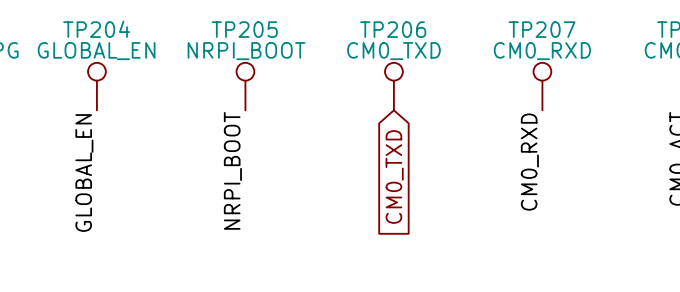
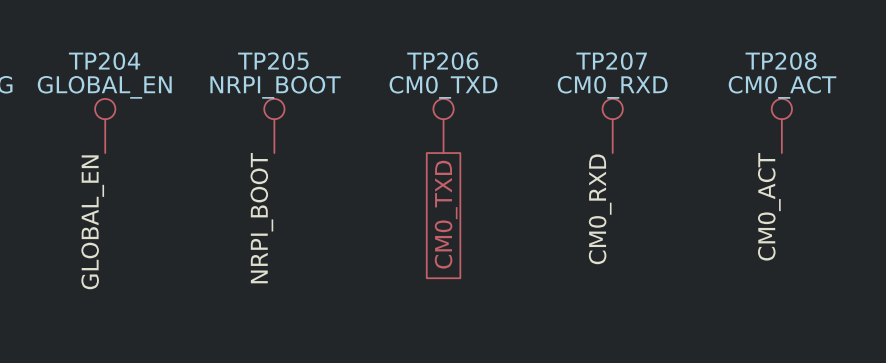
global label shape: input (394, 177) -> passive (446, 214)

